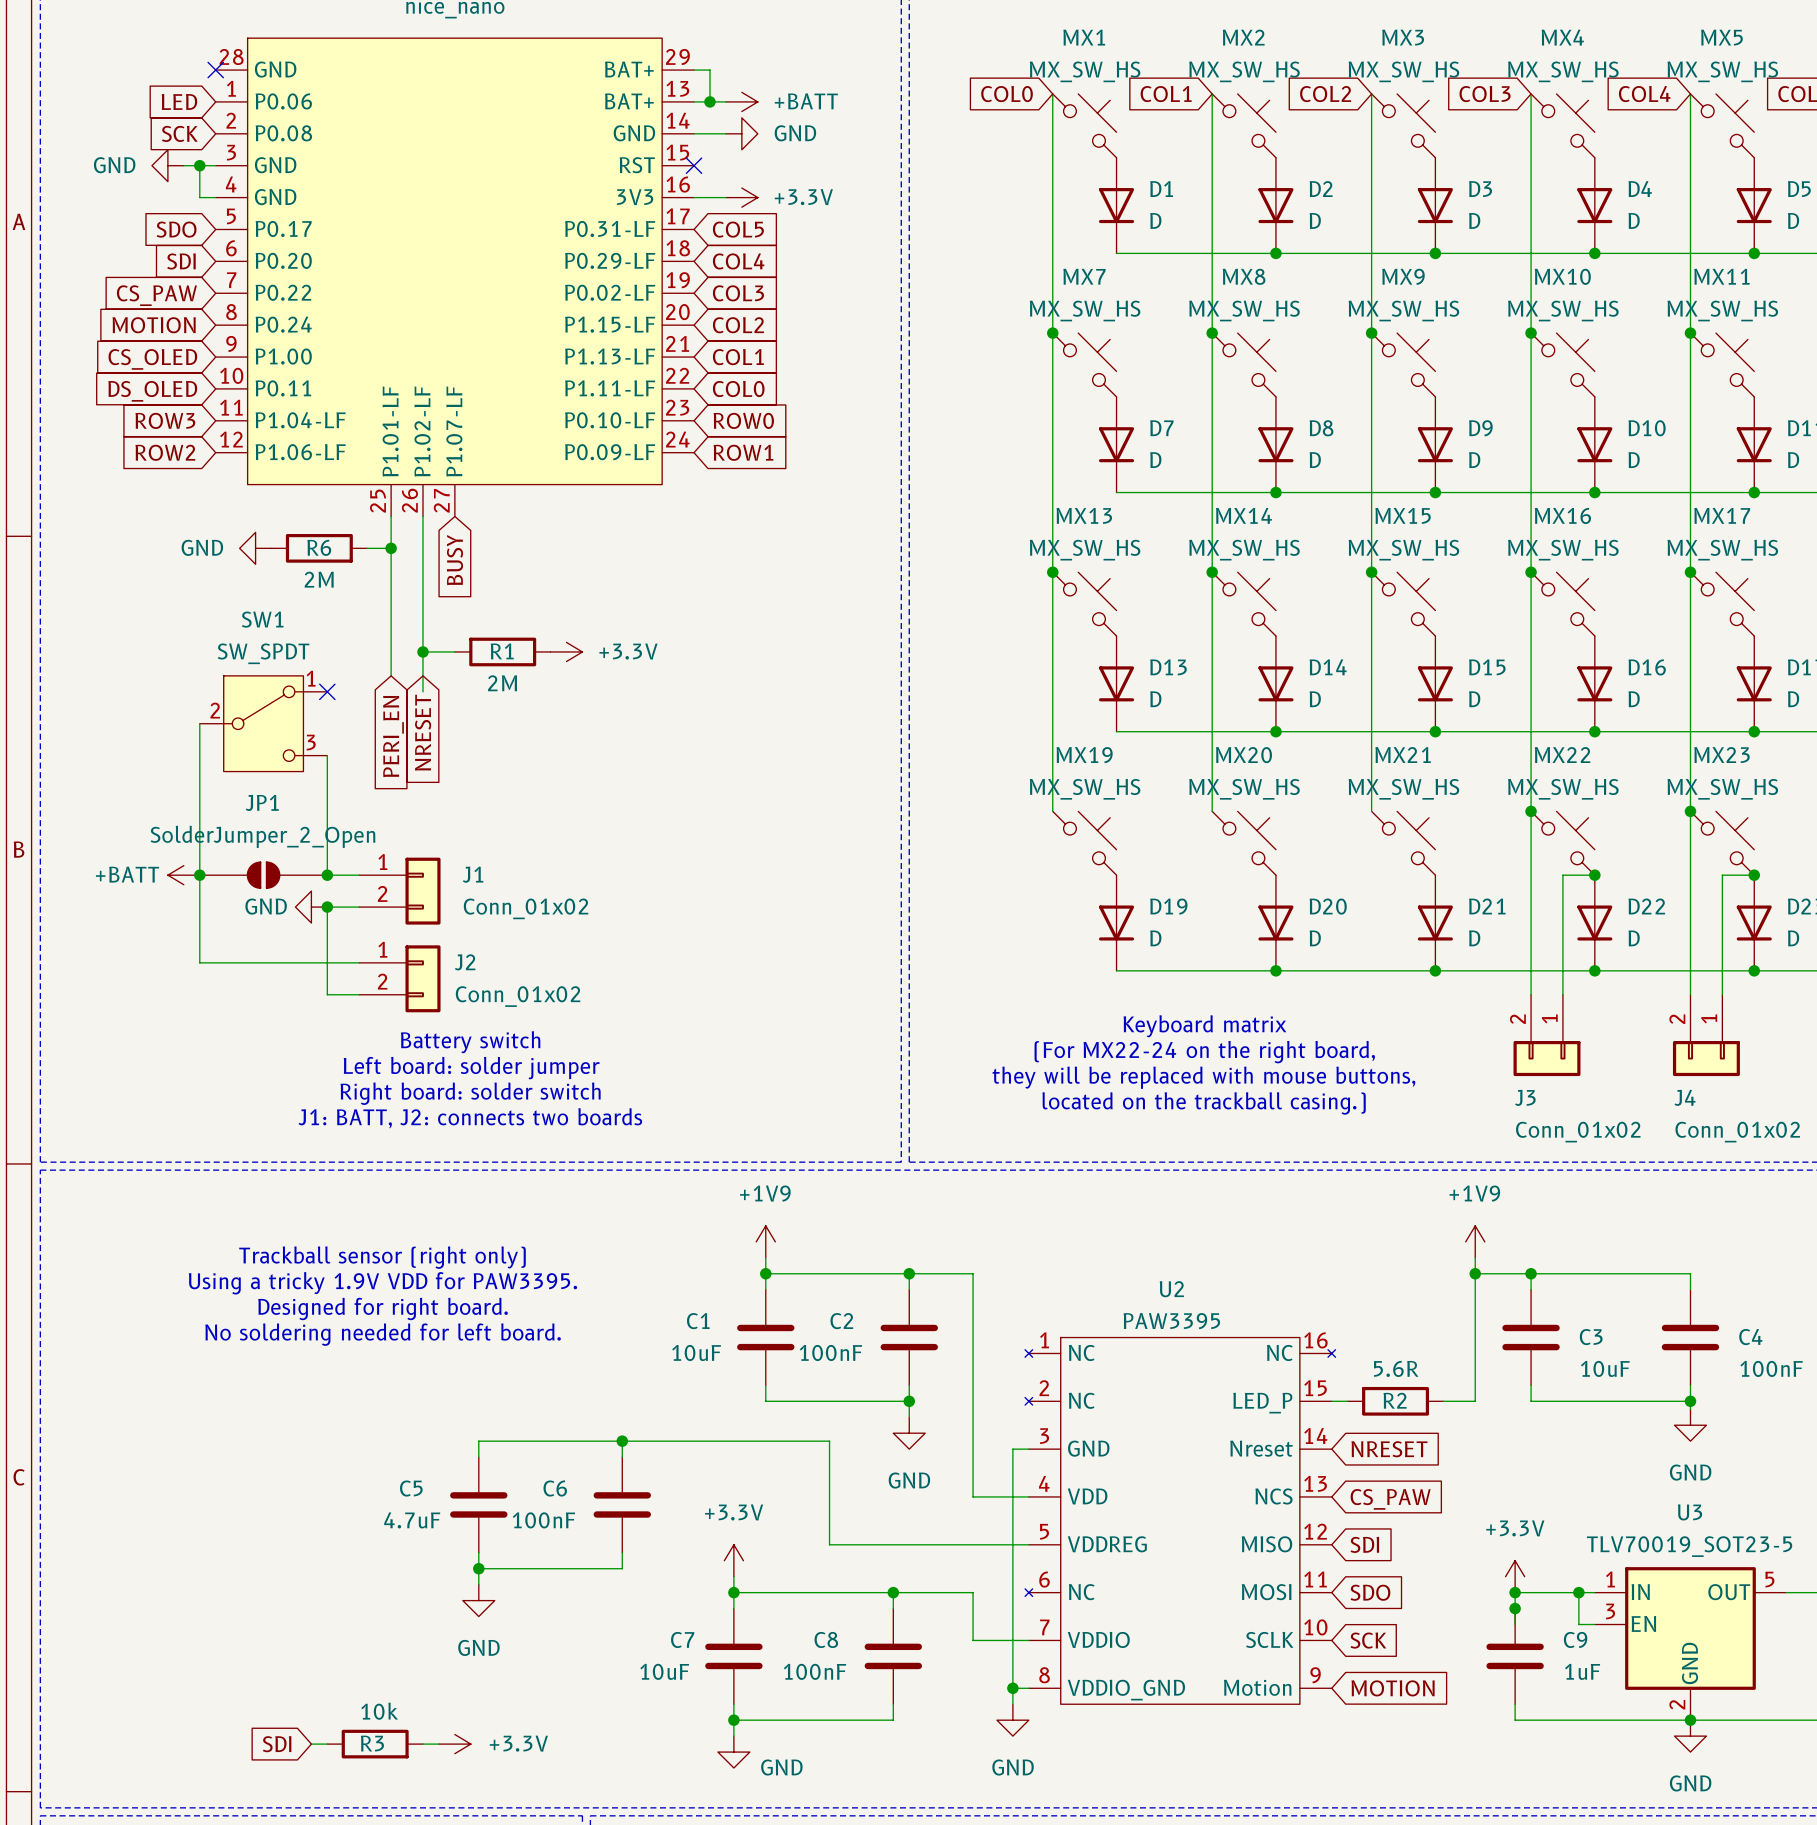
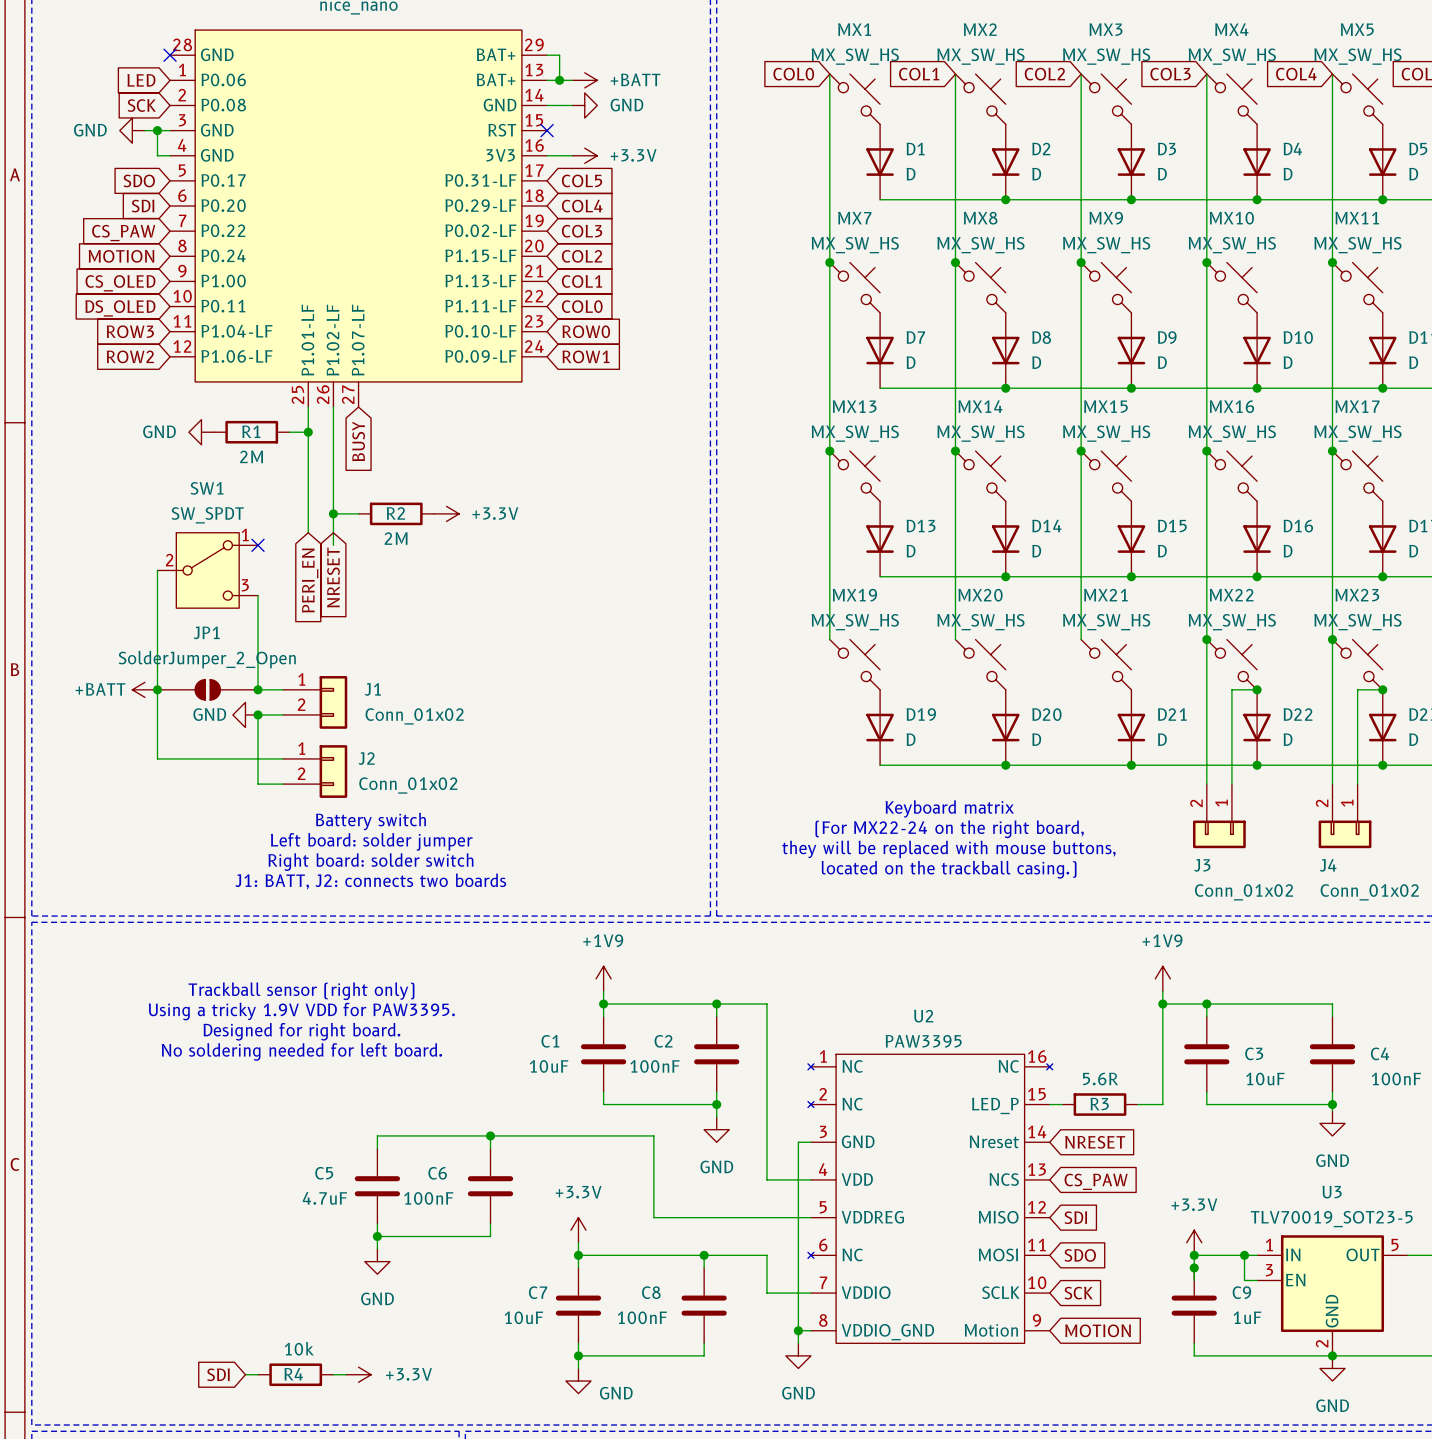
R6 name: R6 (319, 547) -> R1 (251, 431)
R1 name: R1 (502, 651) -> R2 (395, 513)
R2 name: R2 (1395, 1400) -> R3 (1099, 1104)
R3 name: R3 (372, 1743) -> R4 (293, 1374)

